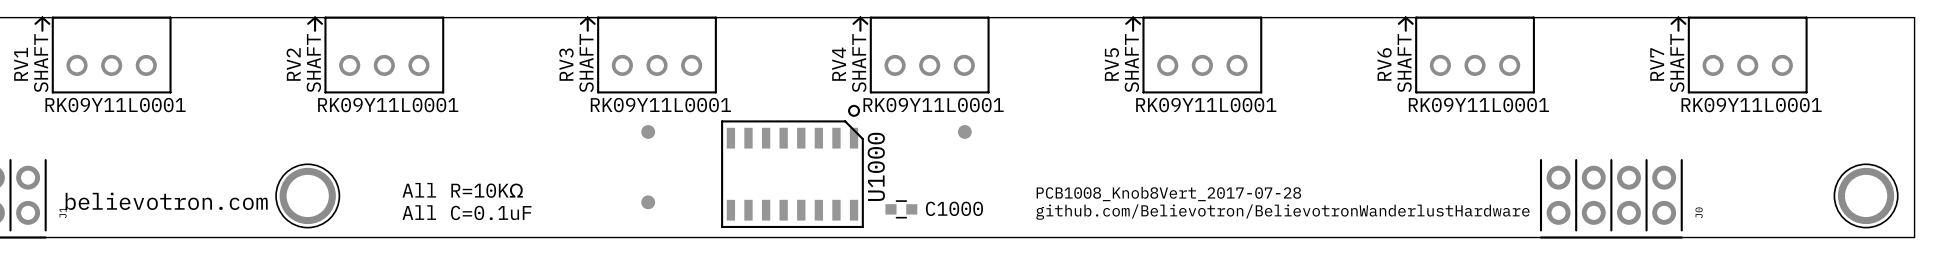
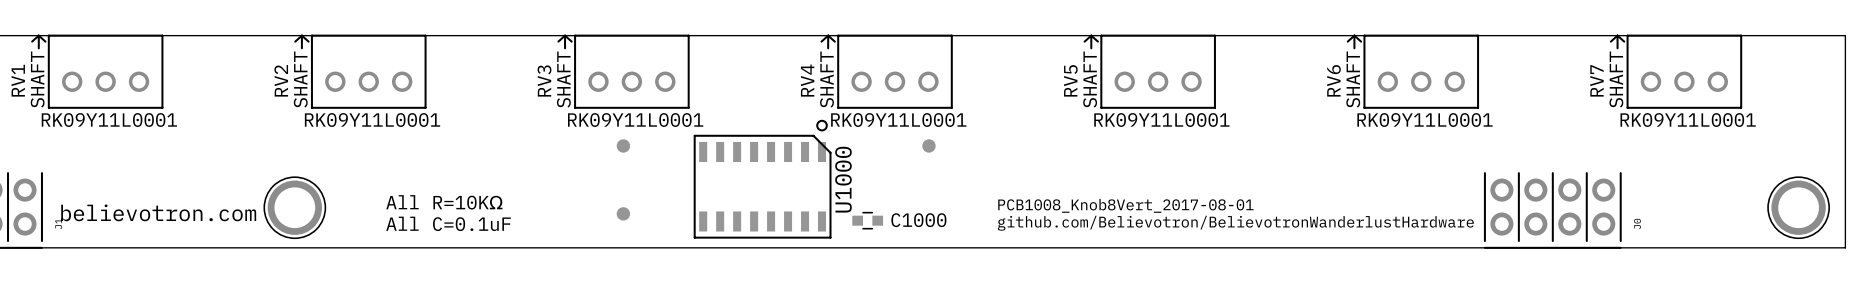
text: PCB1008_Knob8Vert_2017-07-28 (1168, 194) -> PCB1008_Knob8Vert_2017-08-01 (1125, 205)

